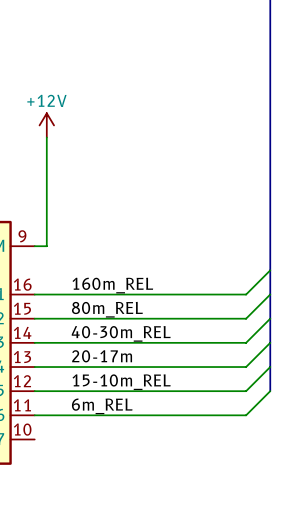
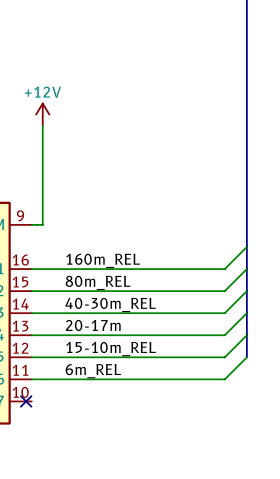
no-connect mark: none -> (26, 401)

